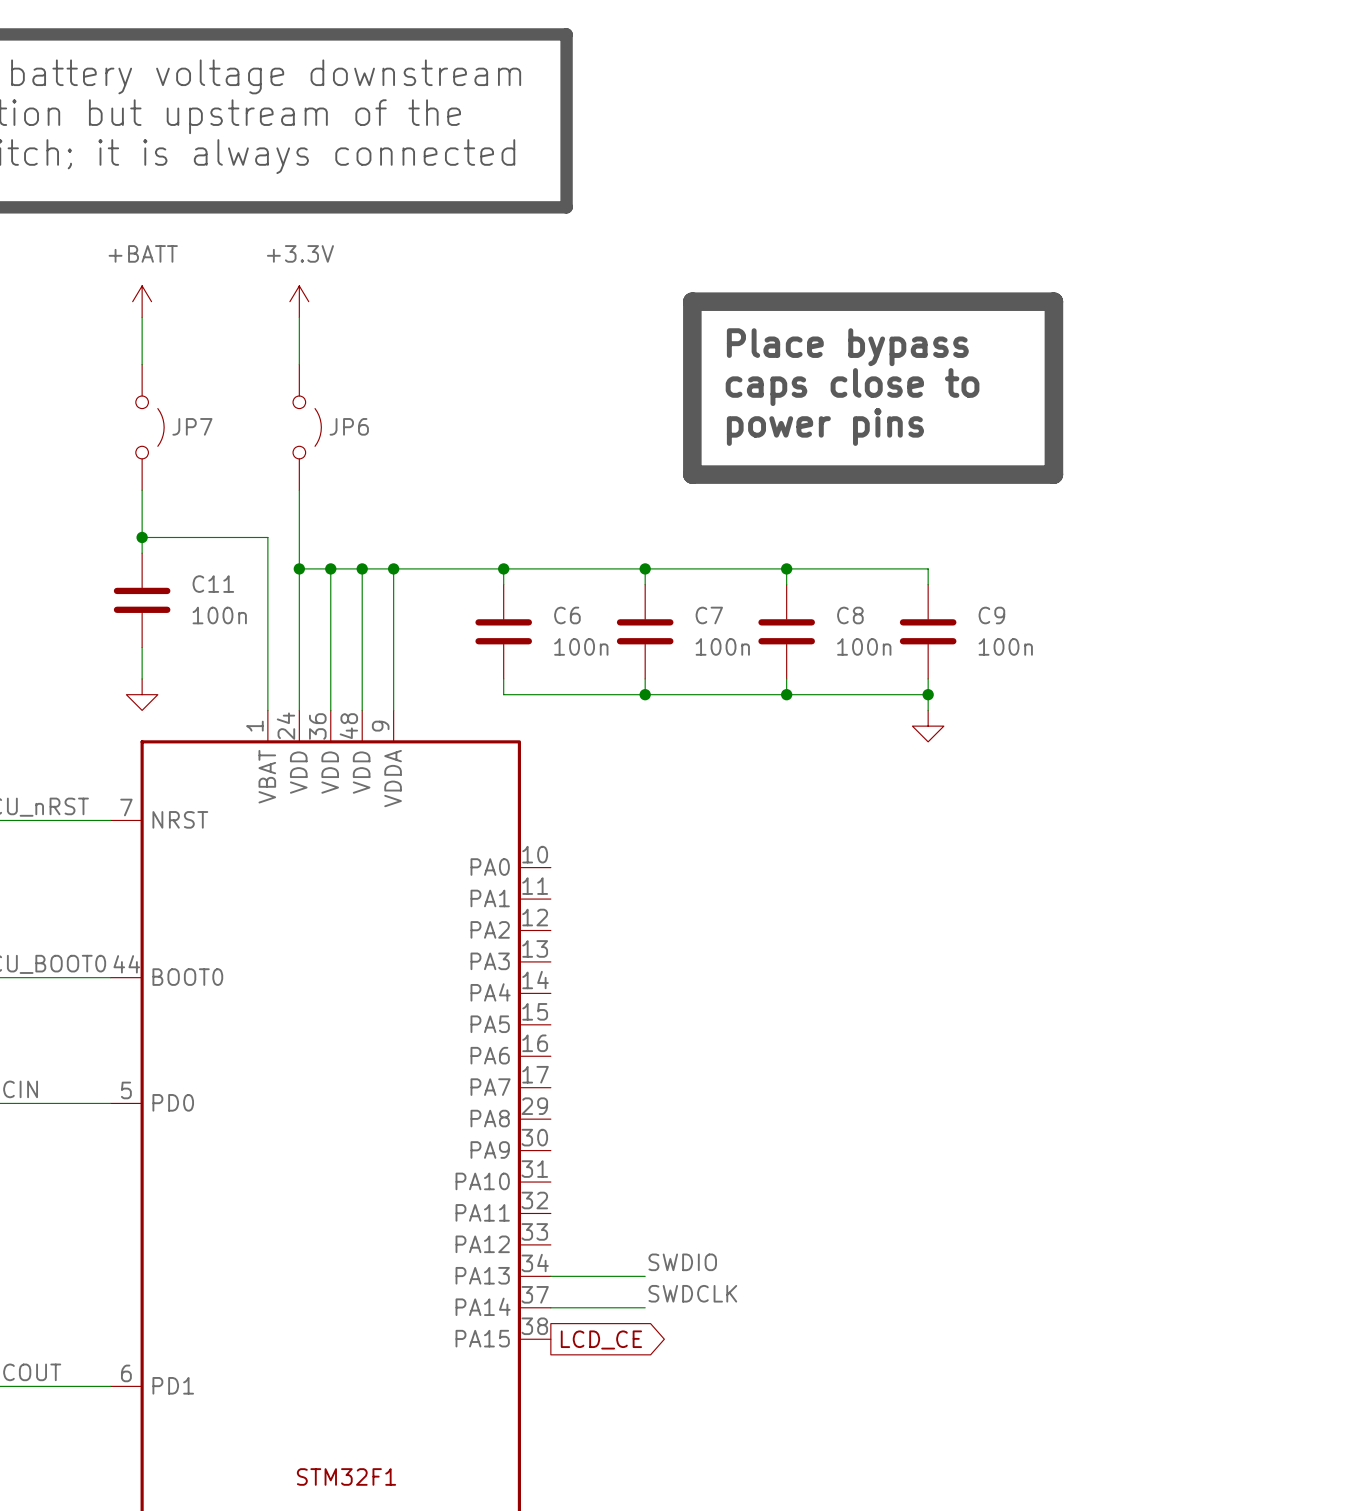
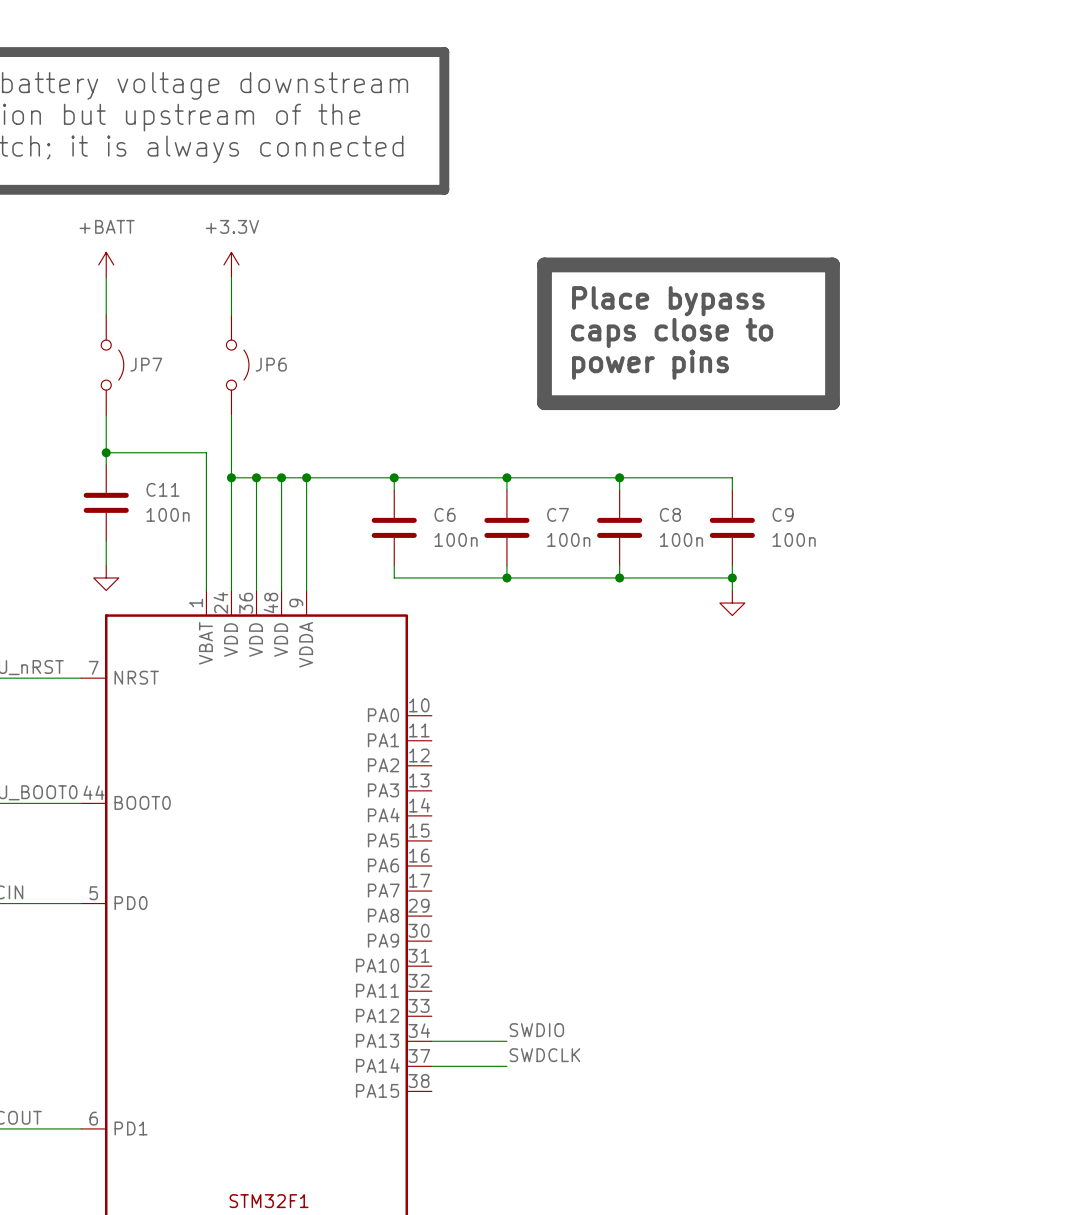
global label: LCD_CE (601, 1339) -> none

